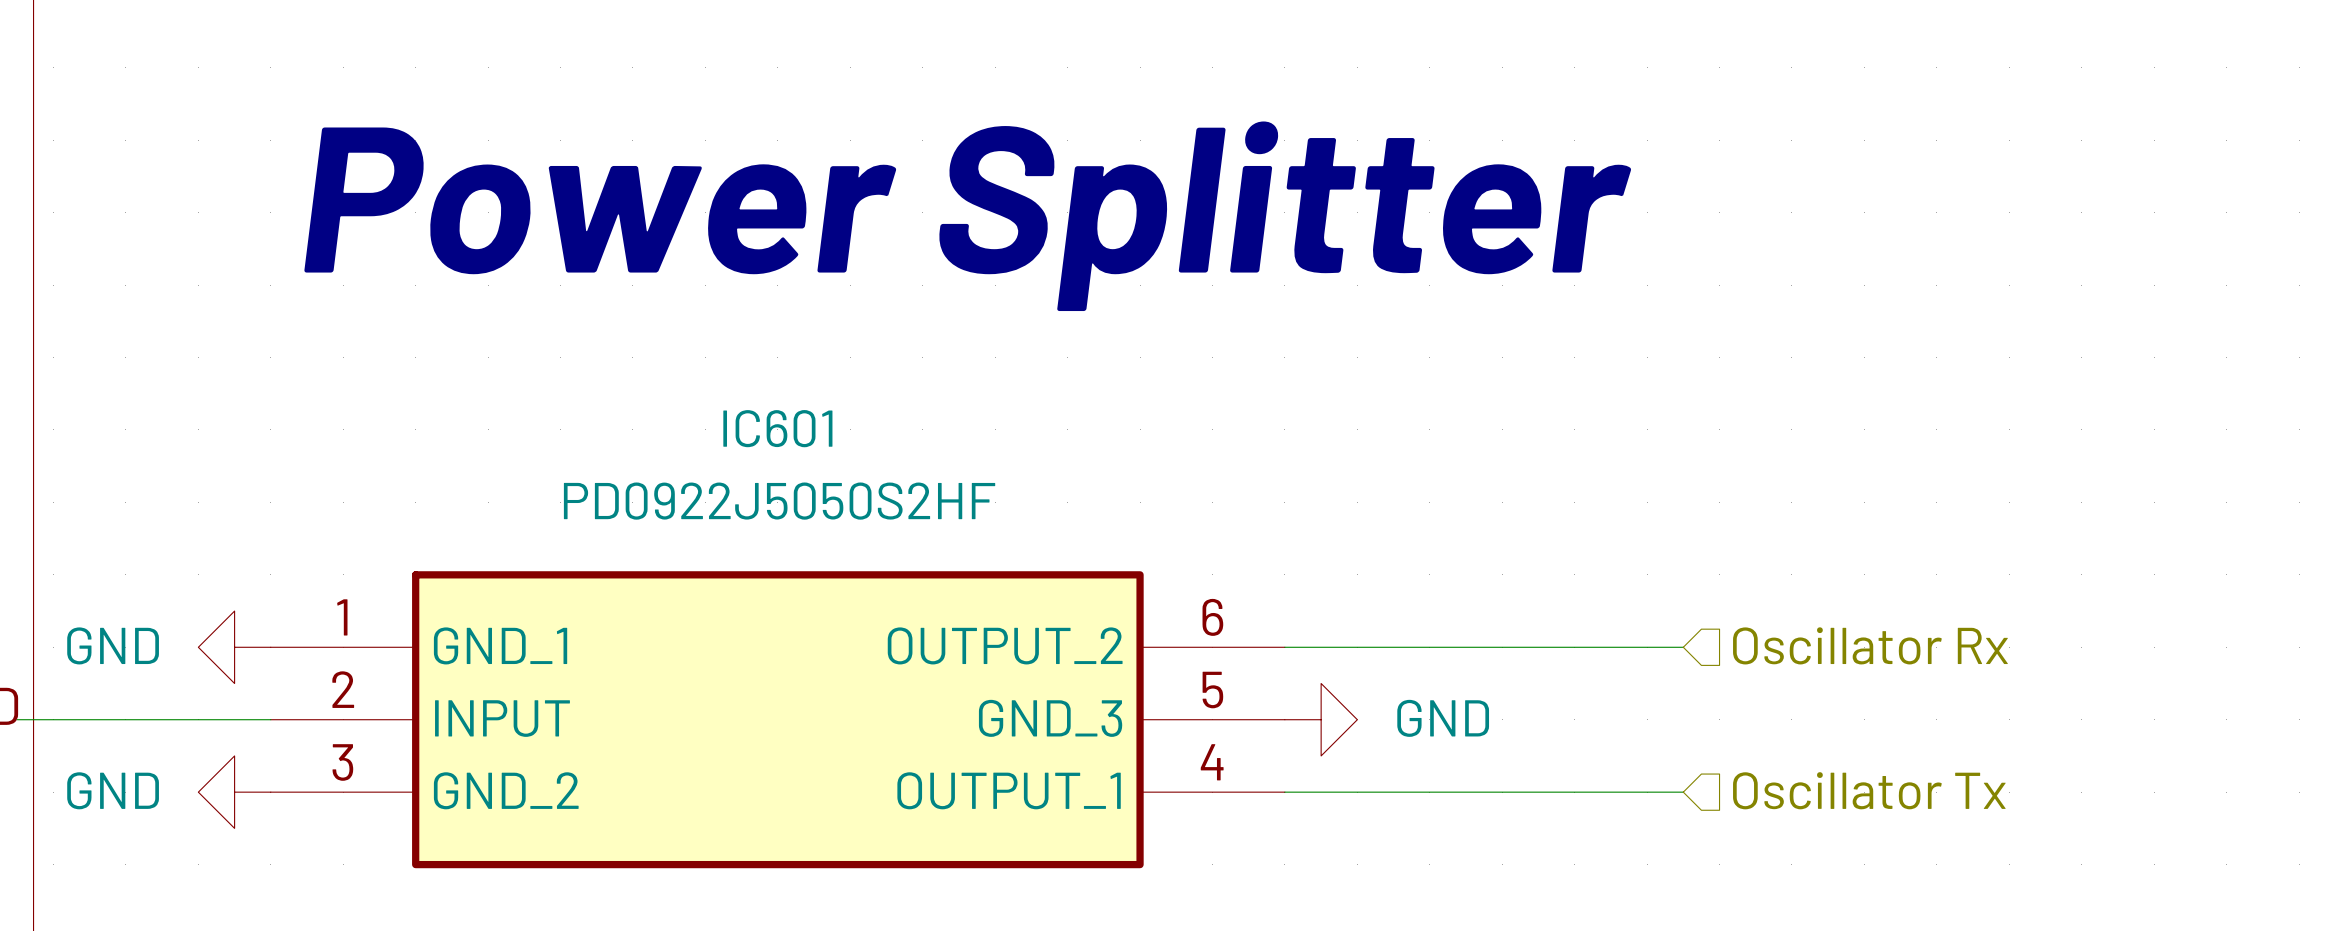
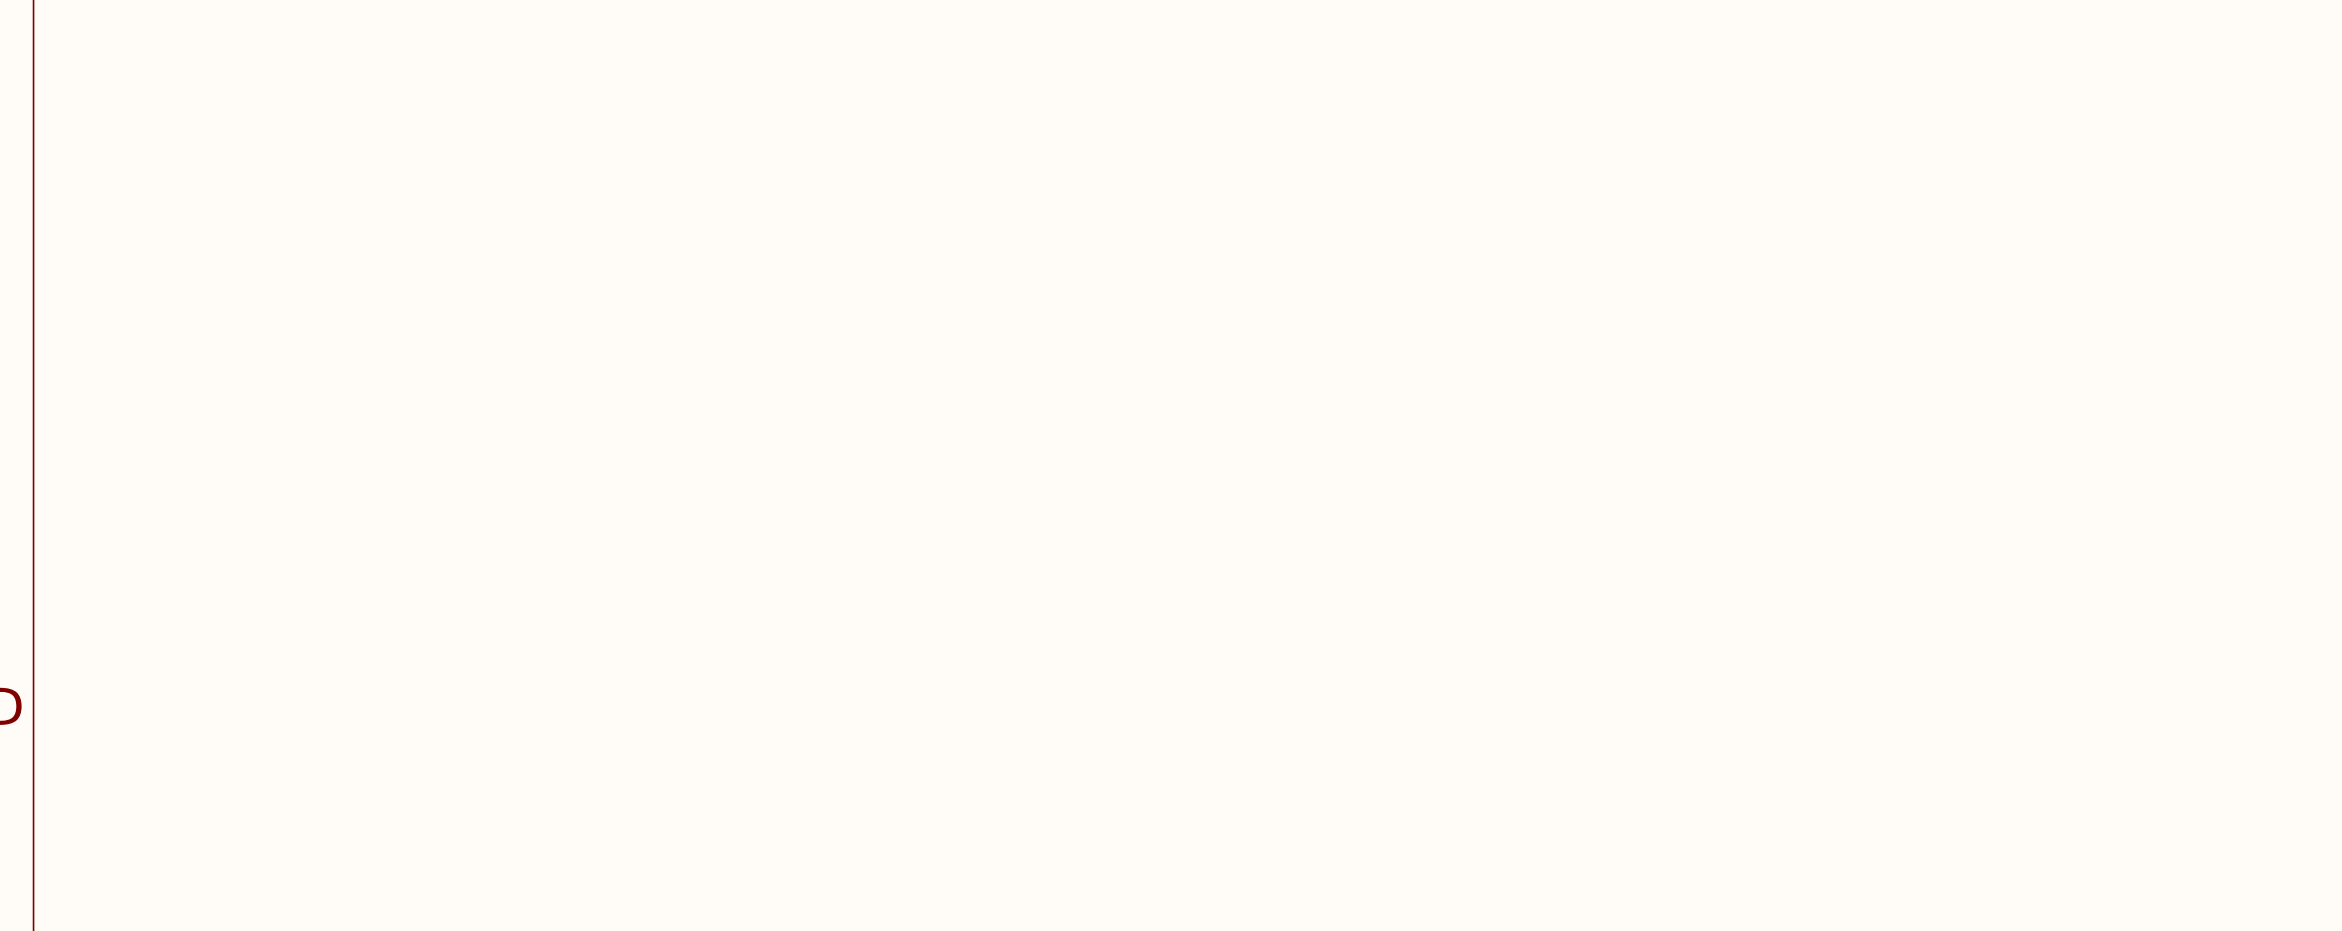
text: Power Splitter (967, 216) -> none
hierarchical label: Oscillator Rx (1870, 645) -> none
power symbol: GND (234, 647) -> none
wire: (1284, 647) (1683, 647) -> none
wire: (17, 719) (270, 719) -> none
IC601: PD0922J5050S2HF (777, 719) -> none
power symbol: GND (1321, 719) -> none
hierarchical label: Oscillator Tx (1869, 790) -> none
power symbol: GND (234, 792) -> none
wire: (1284, 792) (1683, 792) -> none

